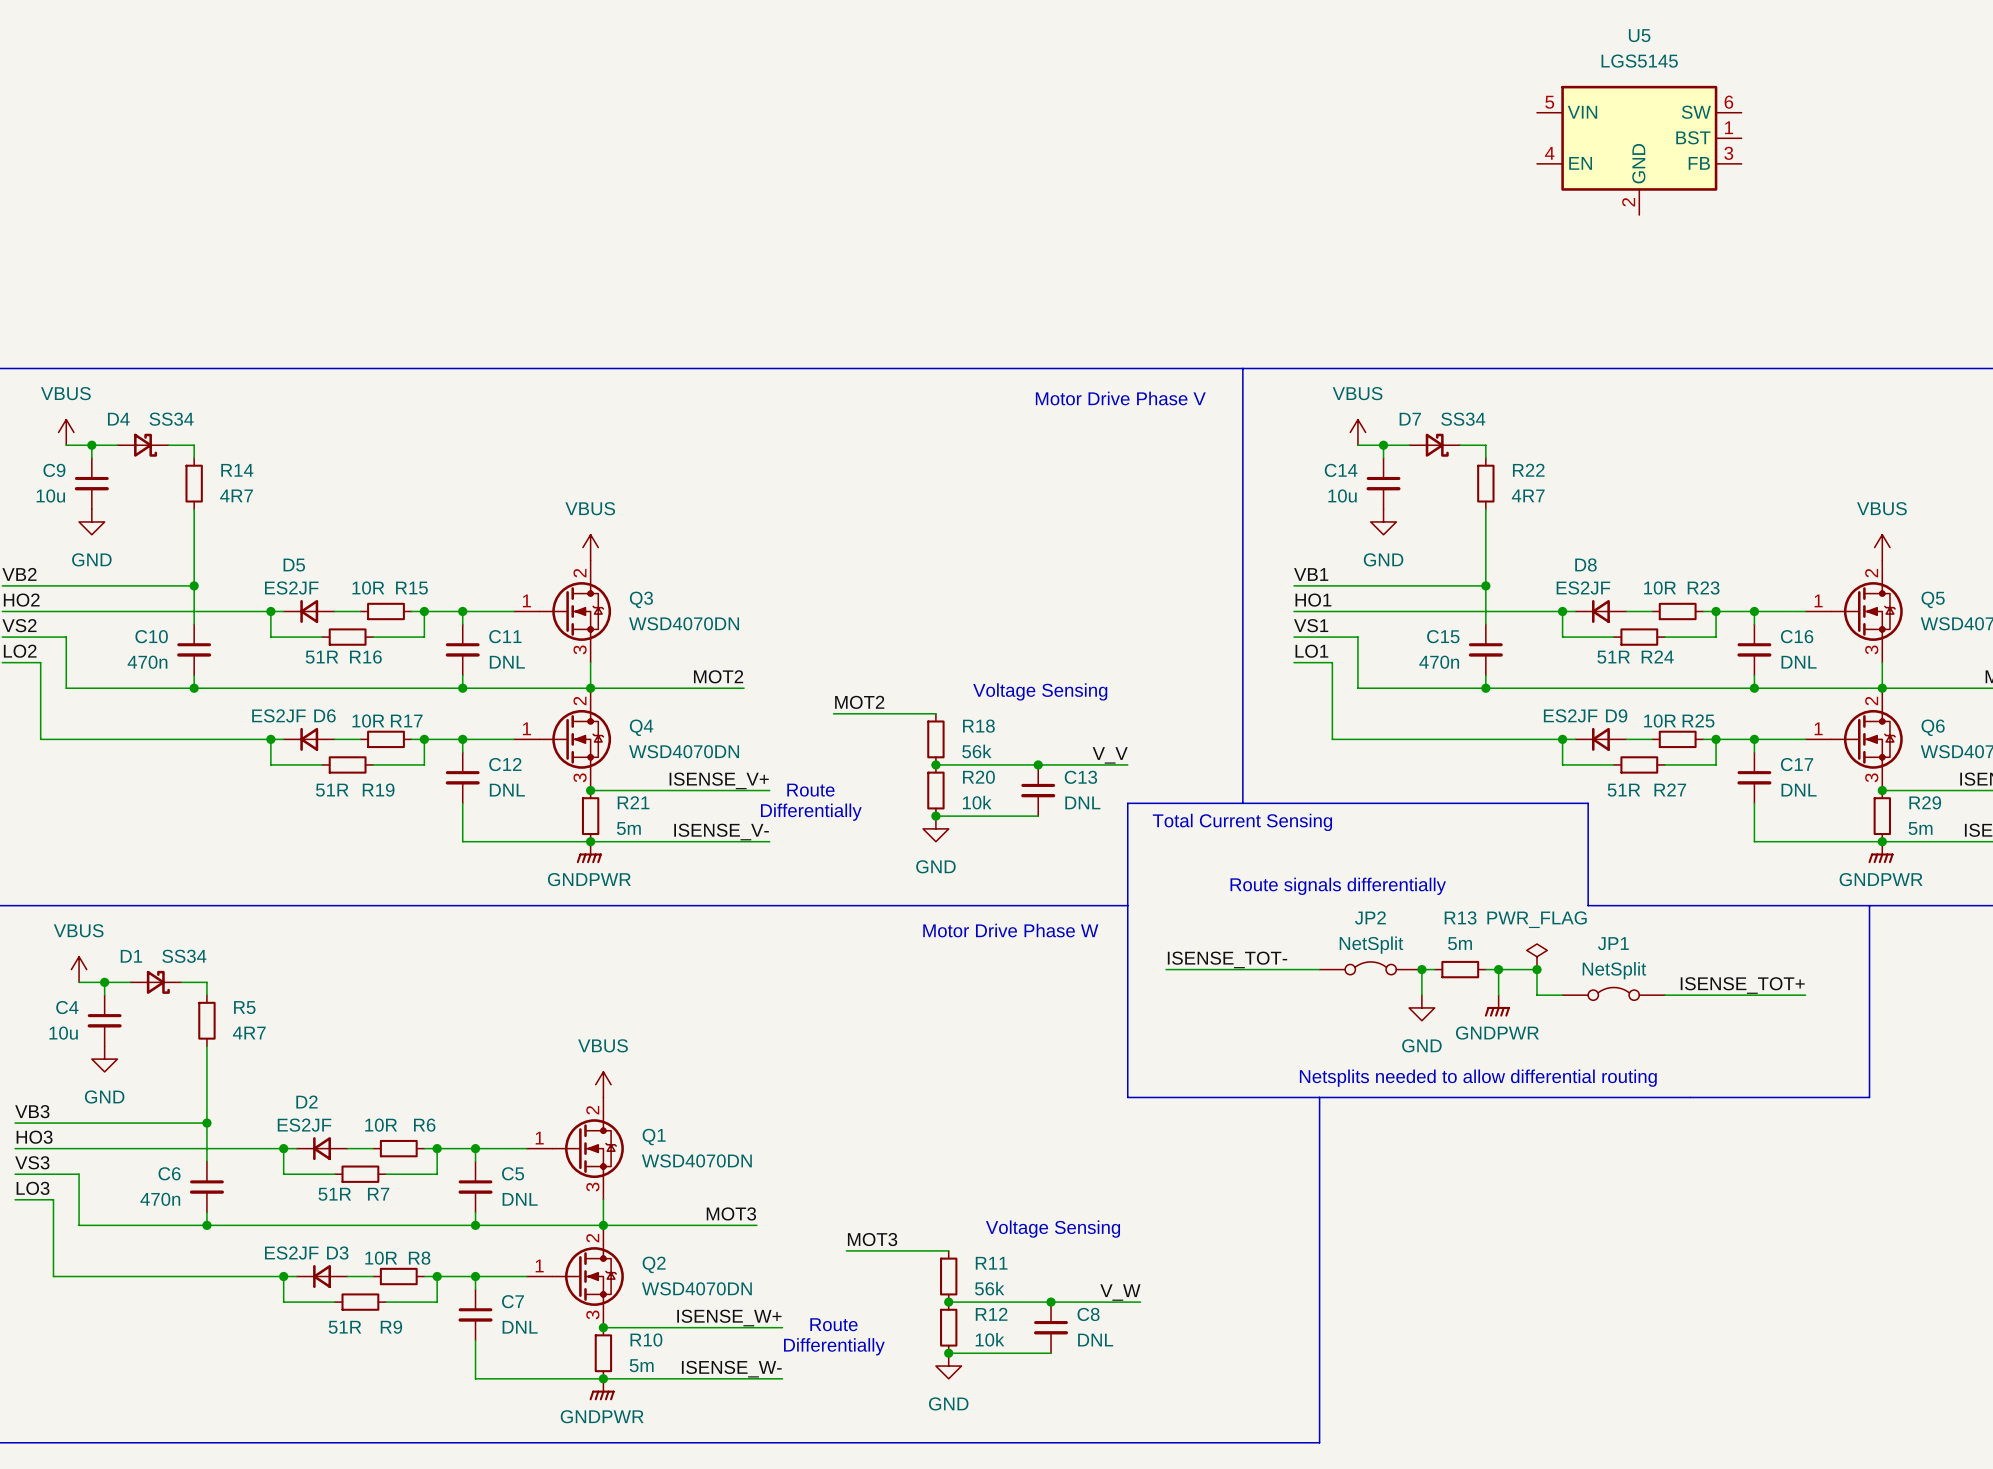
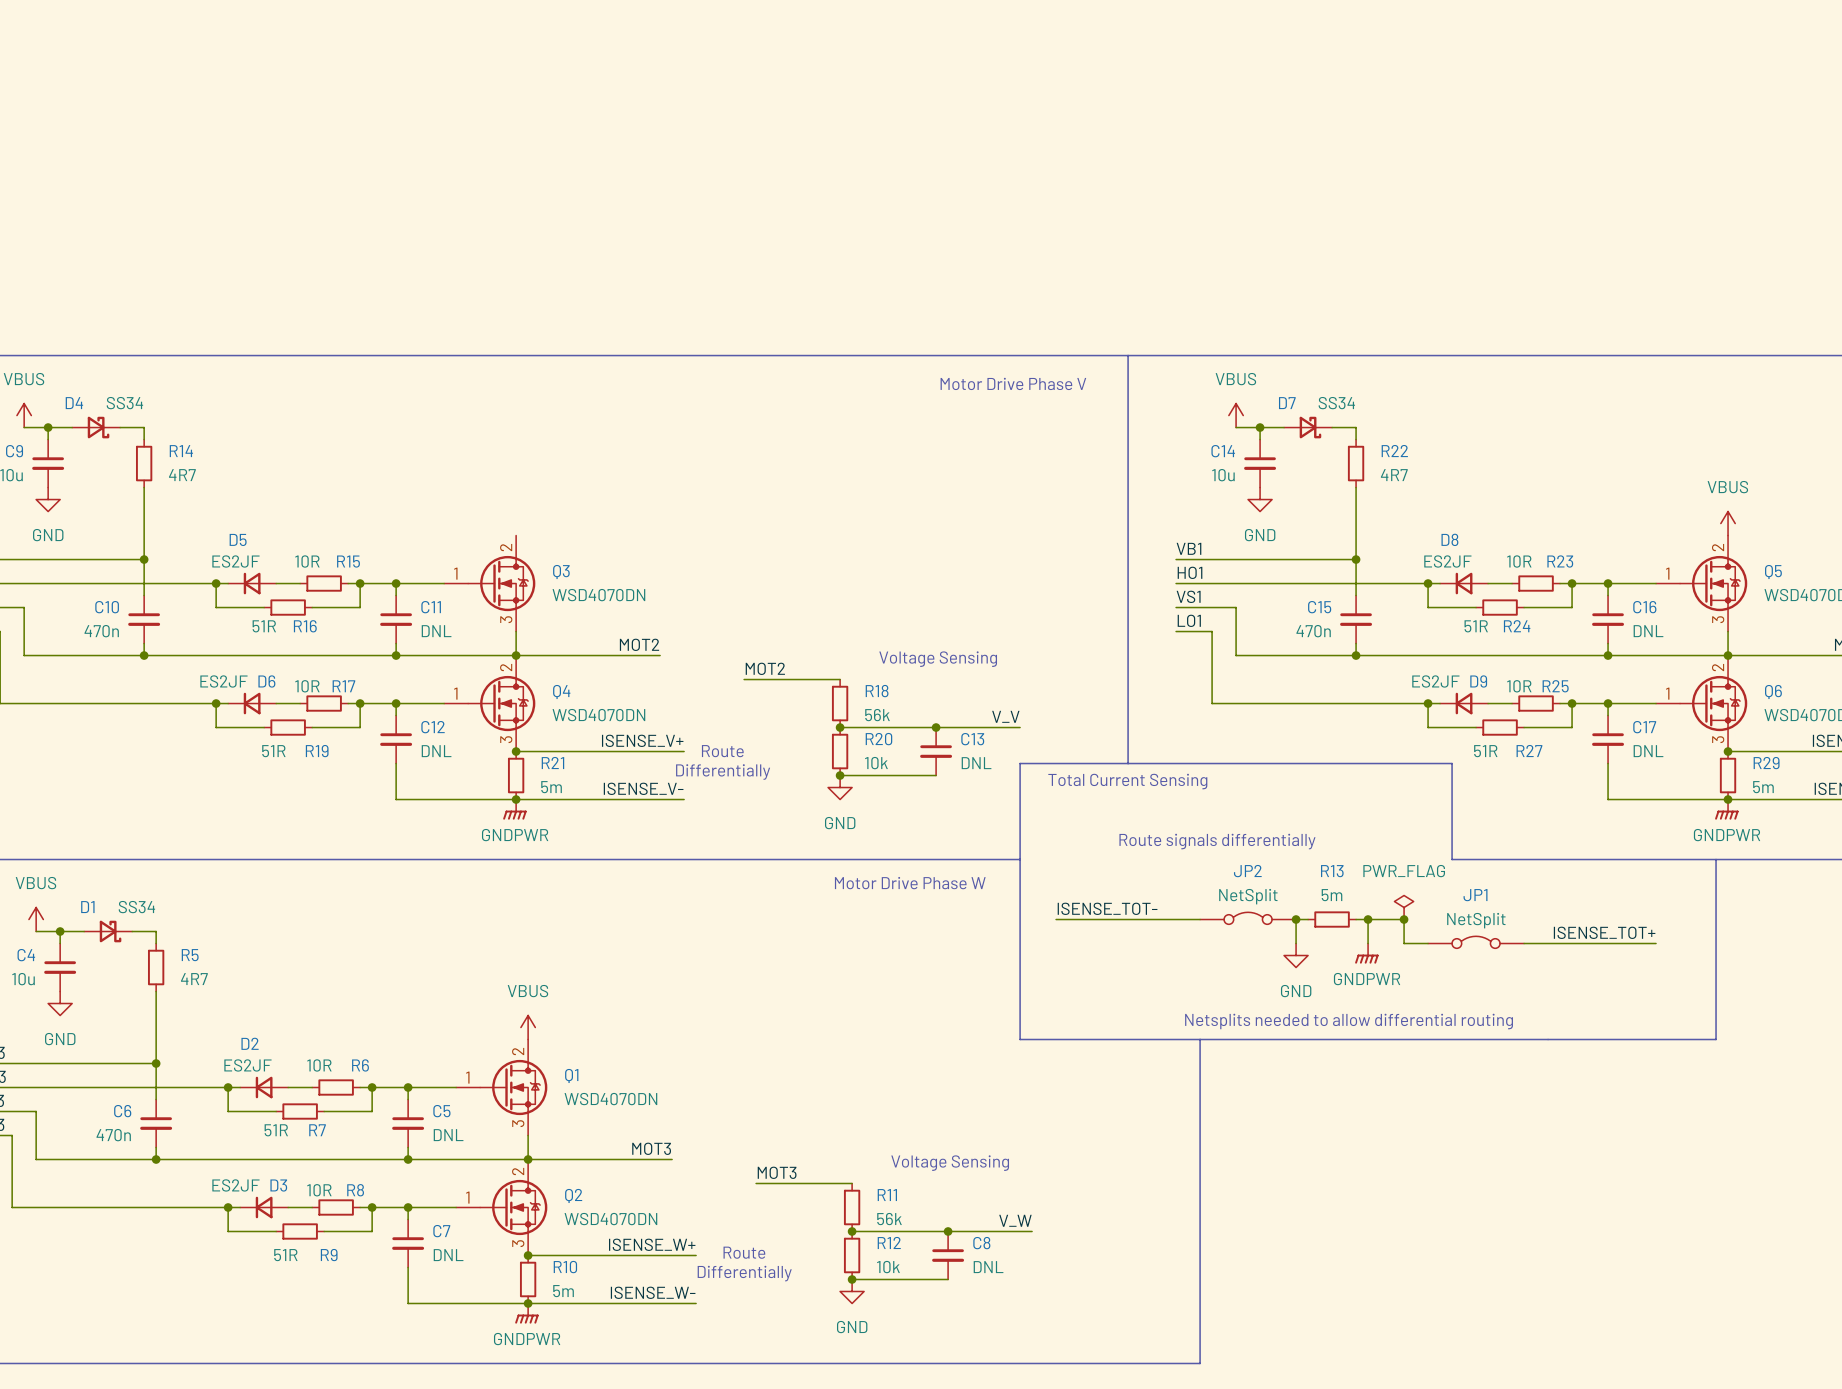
U5: LGS5145 (1639, 150) -> none
power symbol: VBUS (590, 547) -> none

